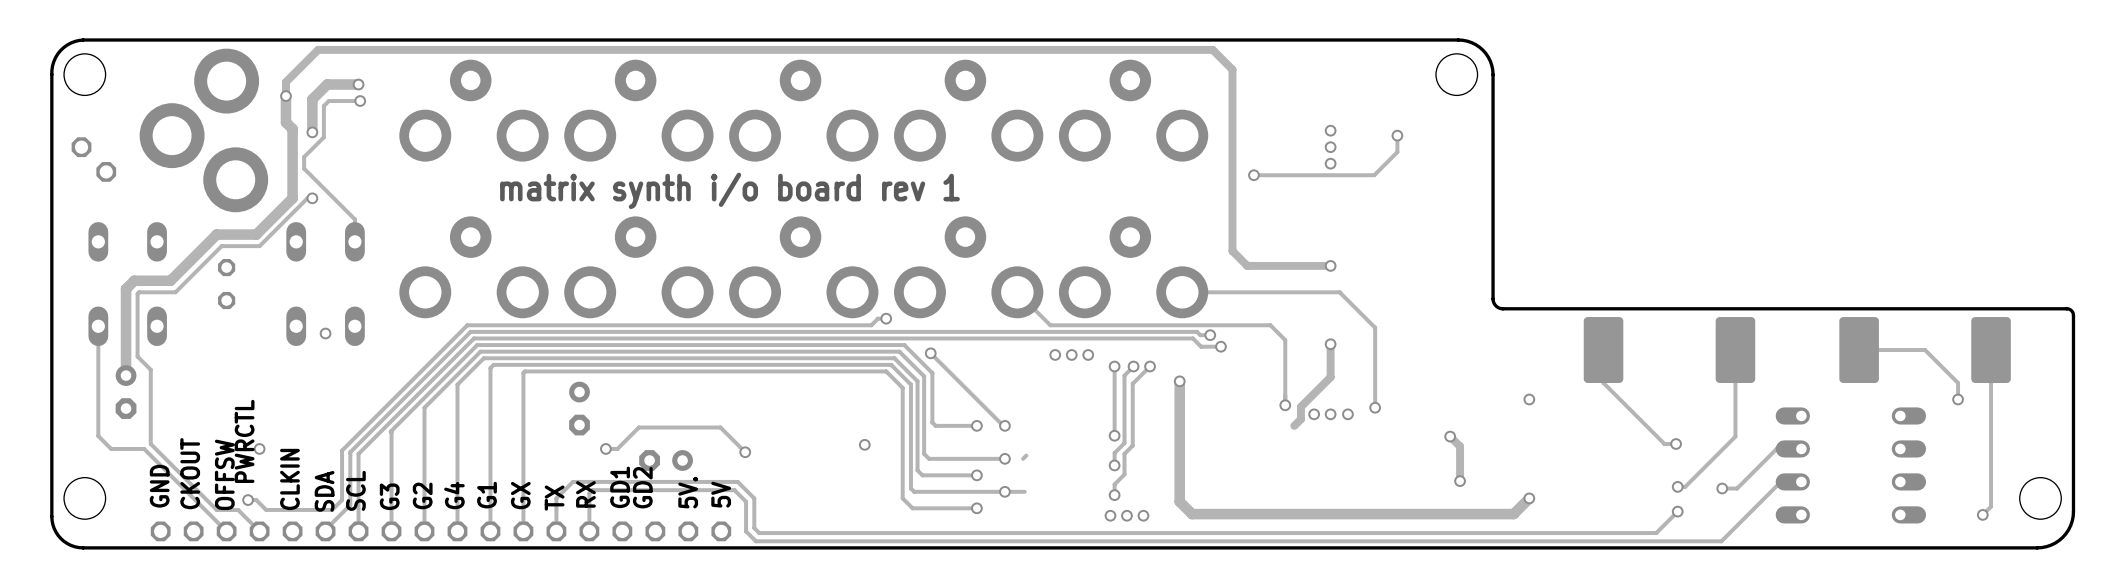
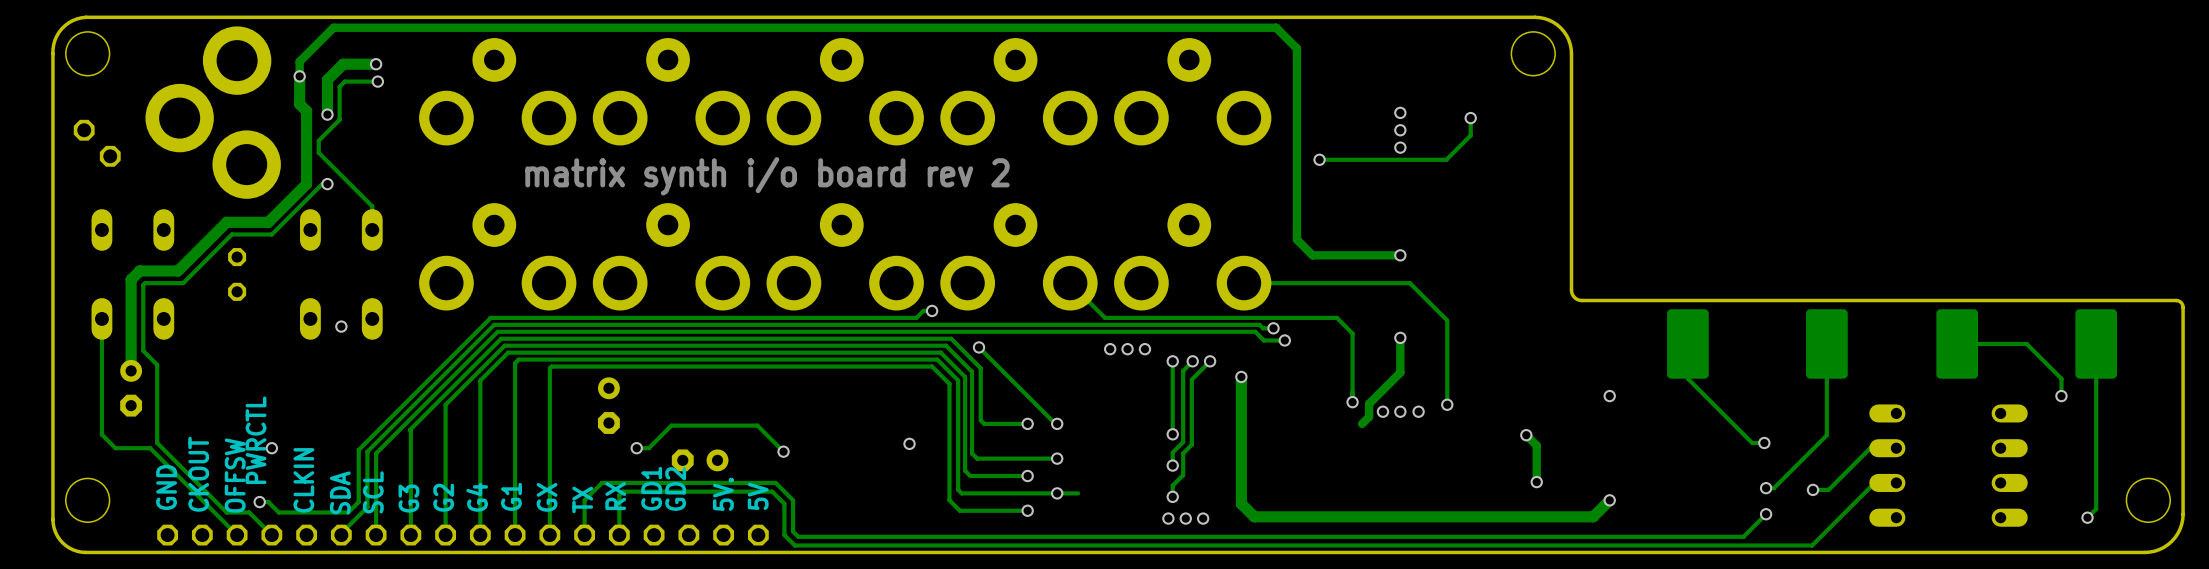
text: matrix synth i/o board rev 1 (729, 190) -> matrix synth i/o board rev 2 (767, 176)
track: (1026, 455) (1023, 458) -> none

